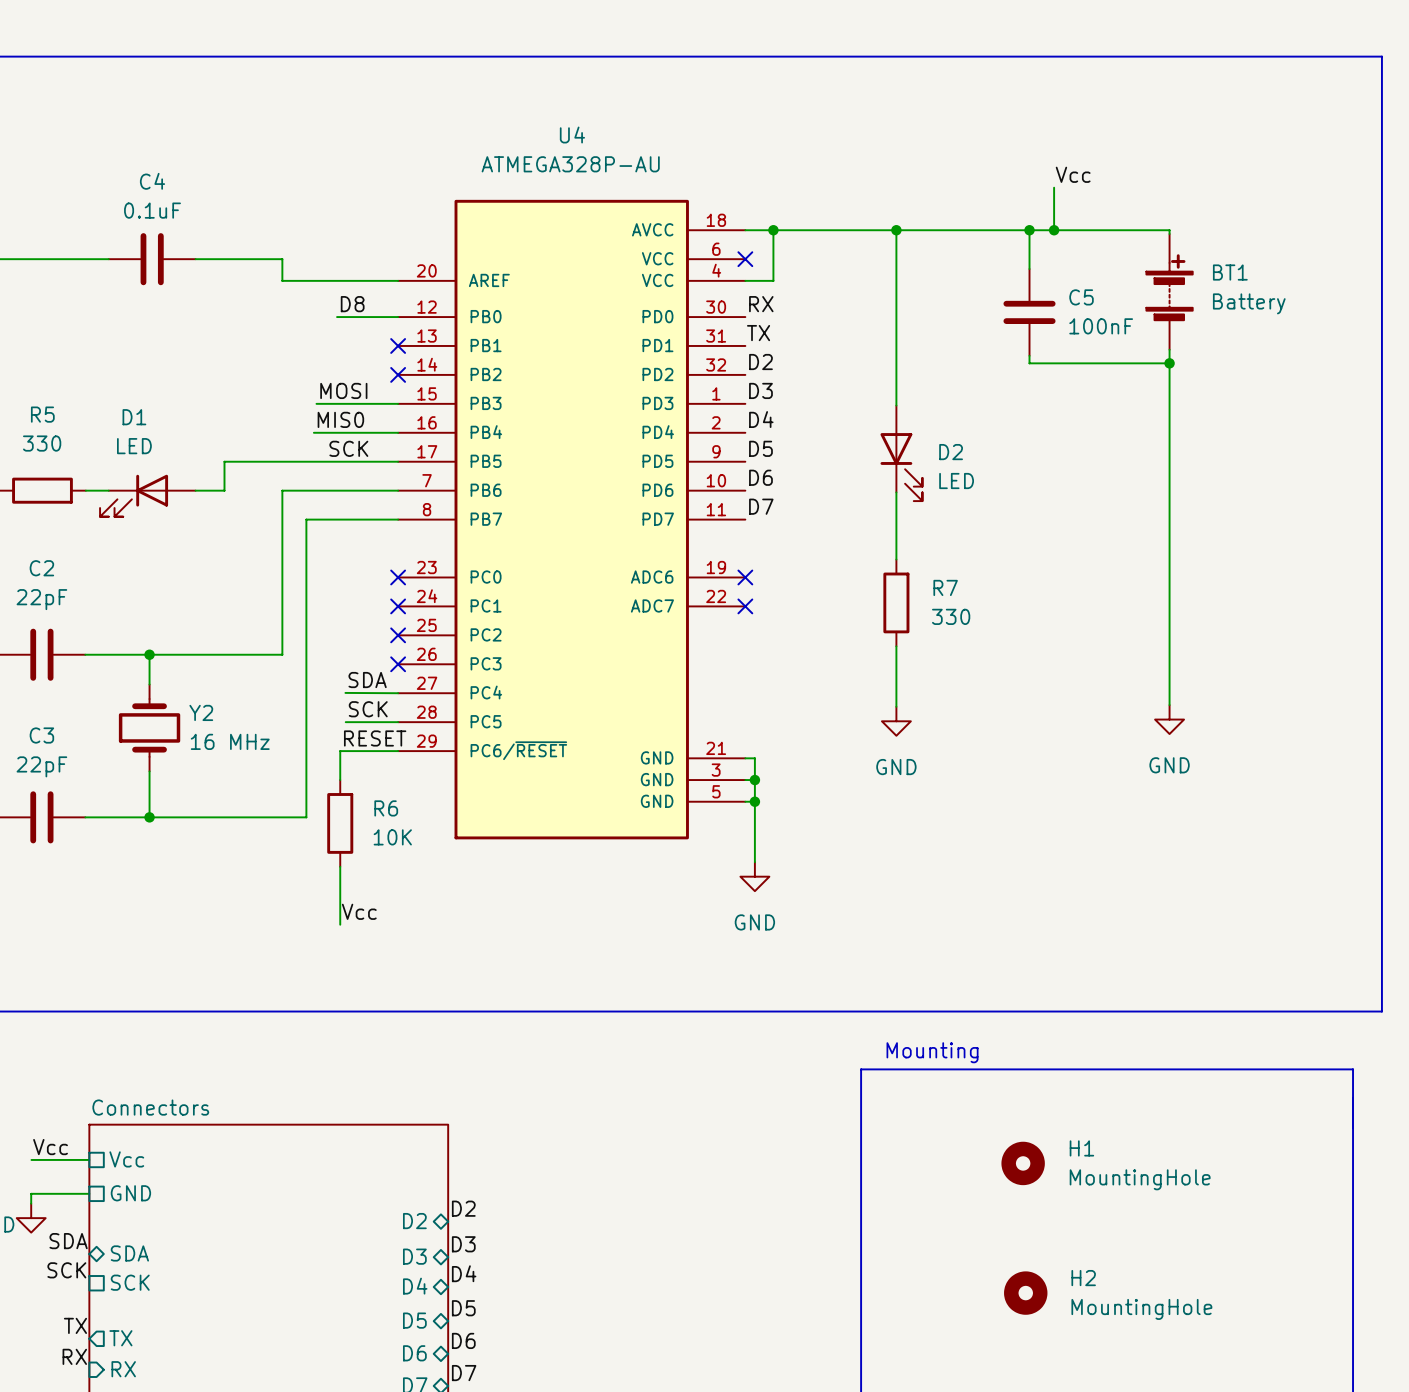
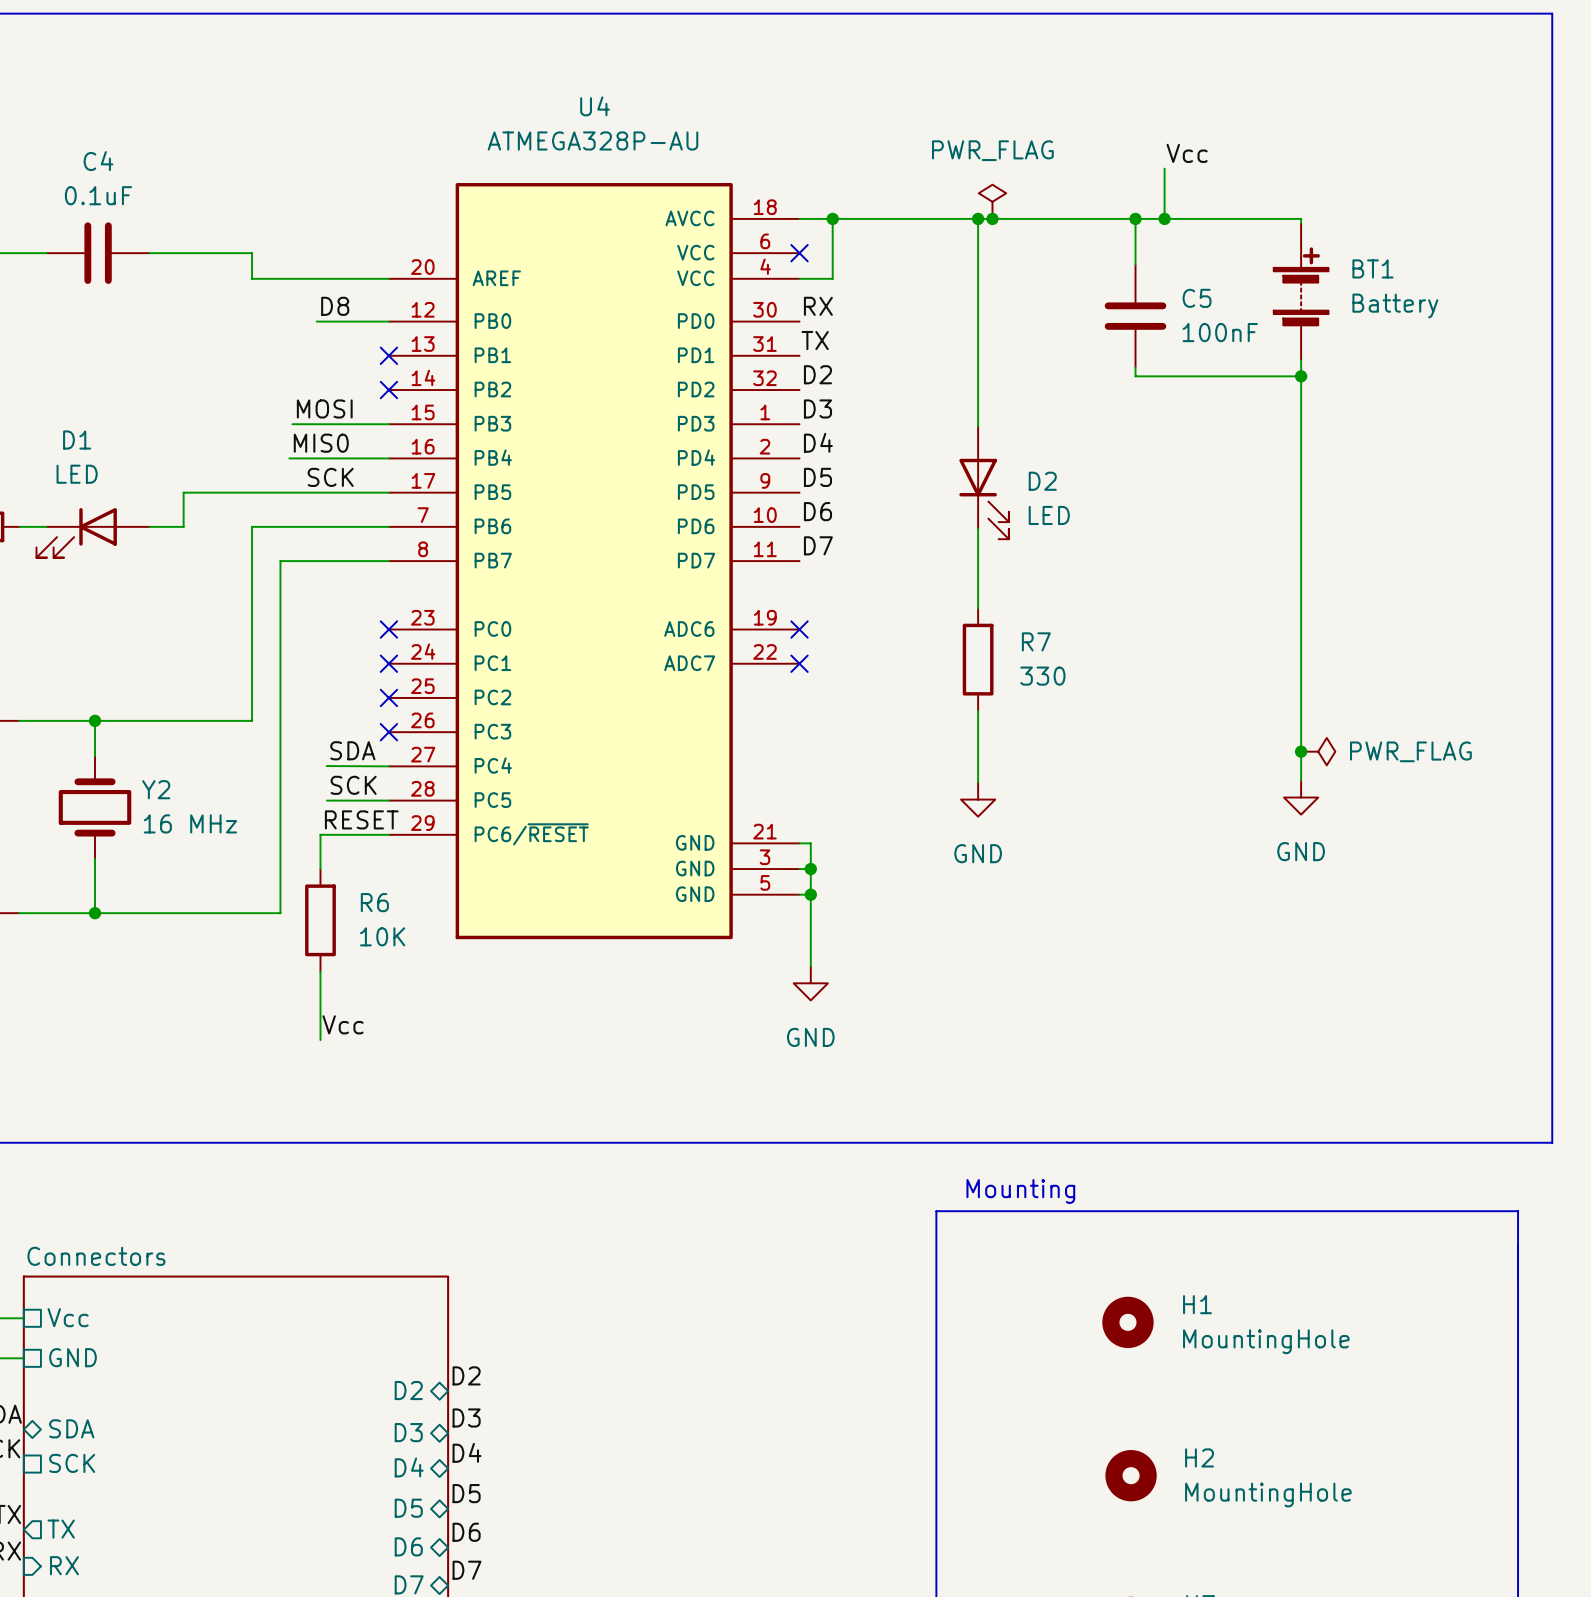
power symbol: none -> PWR_FLAG (992, 201)
junction: none -> (992, 218)
junction: none -> (1301, 751)
power symbol: none -> PWR_FLAG (1318, 751)

